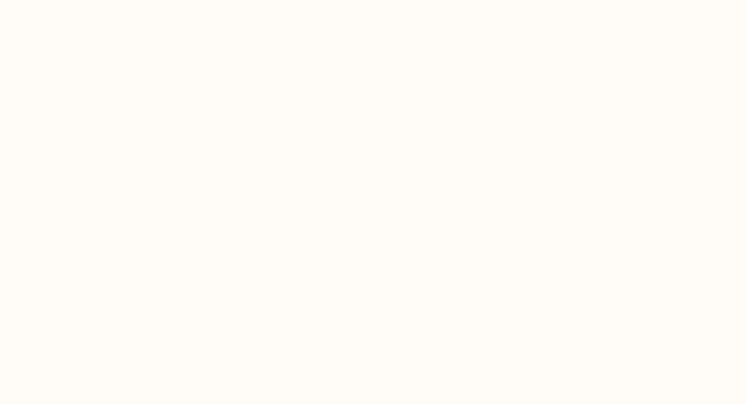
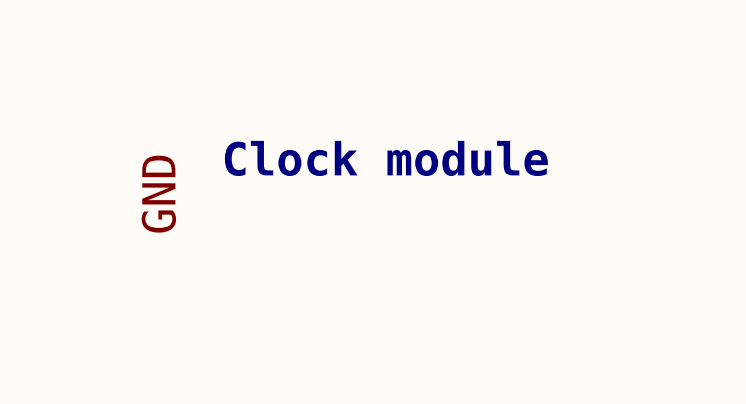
text: none -> Clock module (386, 158)
label: none -> GND (158, 194)

